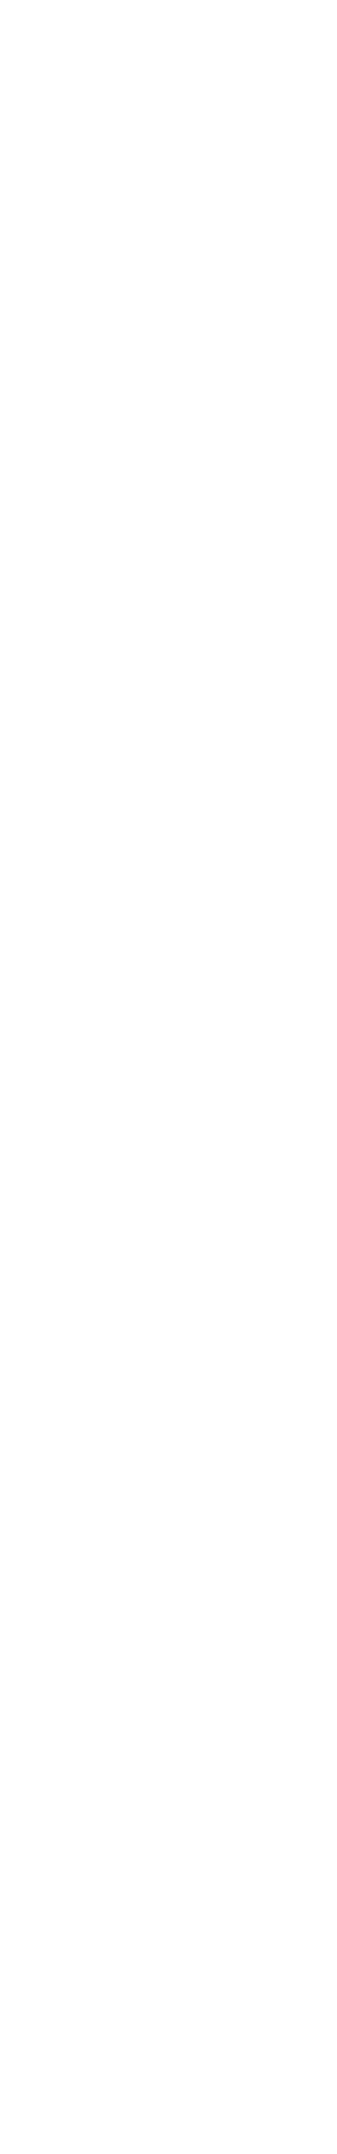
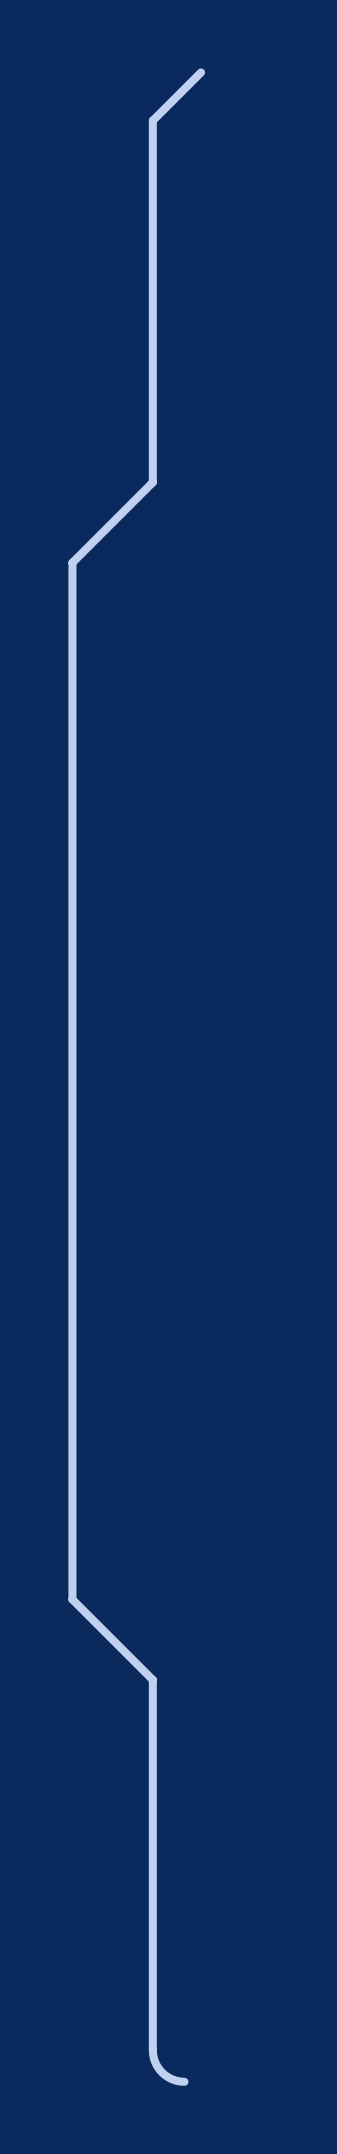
board edge: none -> (201, 72) (152, 120) (152, 482) (72, 562) (72, 1599) (152, 1679) (153, 2054) (157, 2065) (162, 2072) (172, 2079) (184, 2081)

